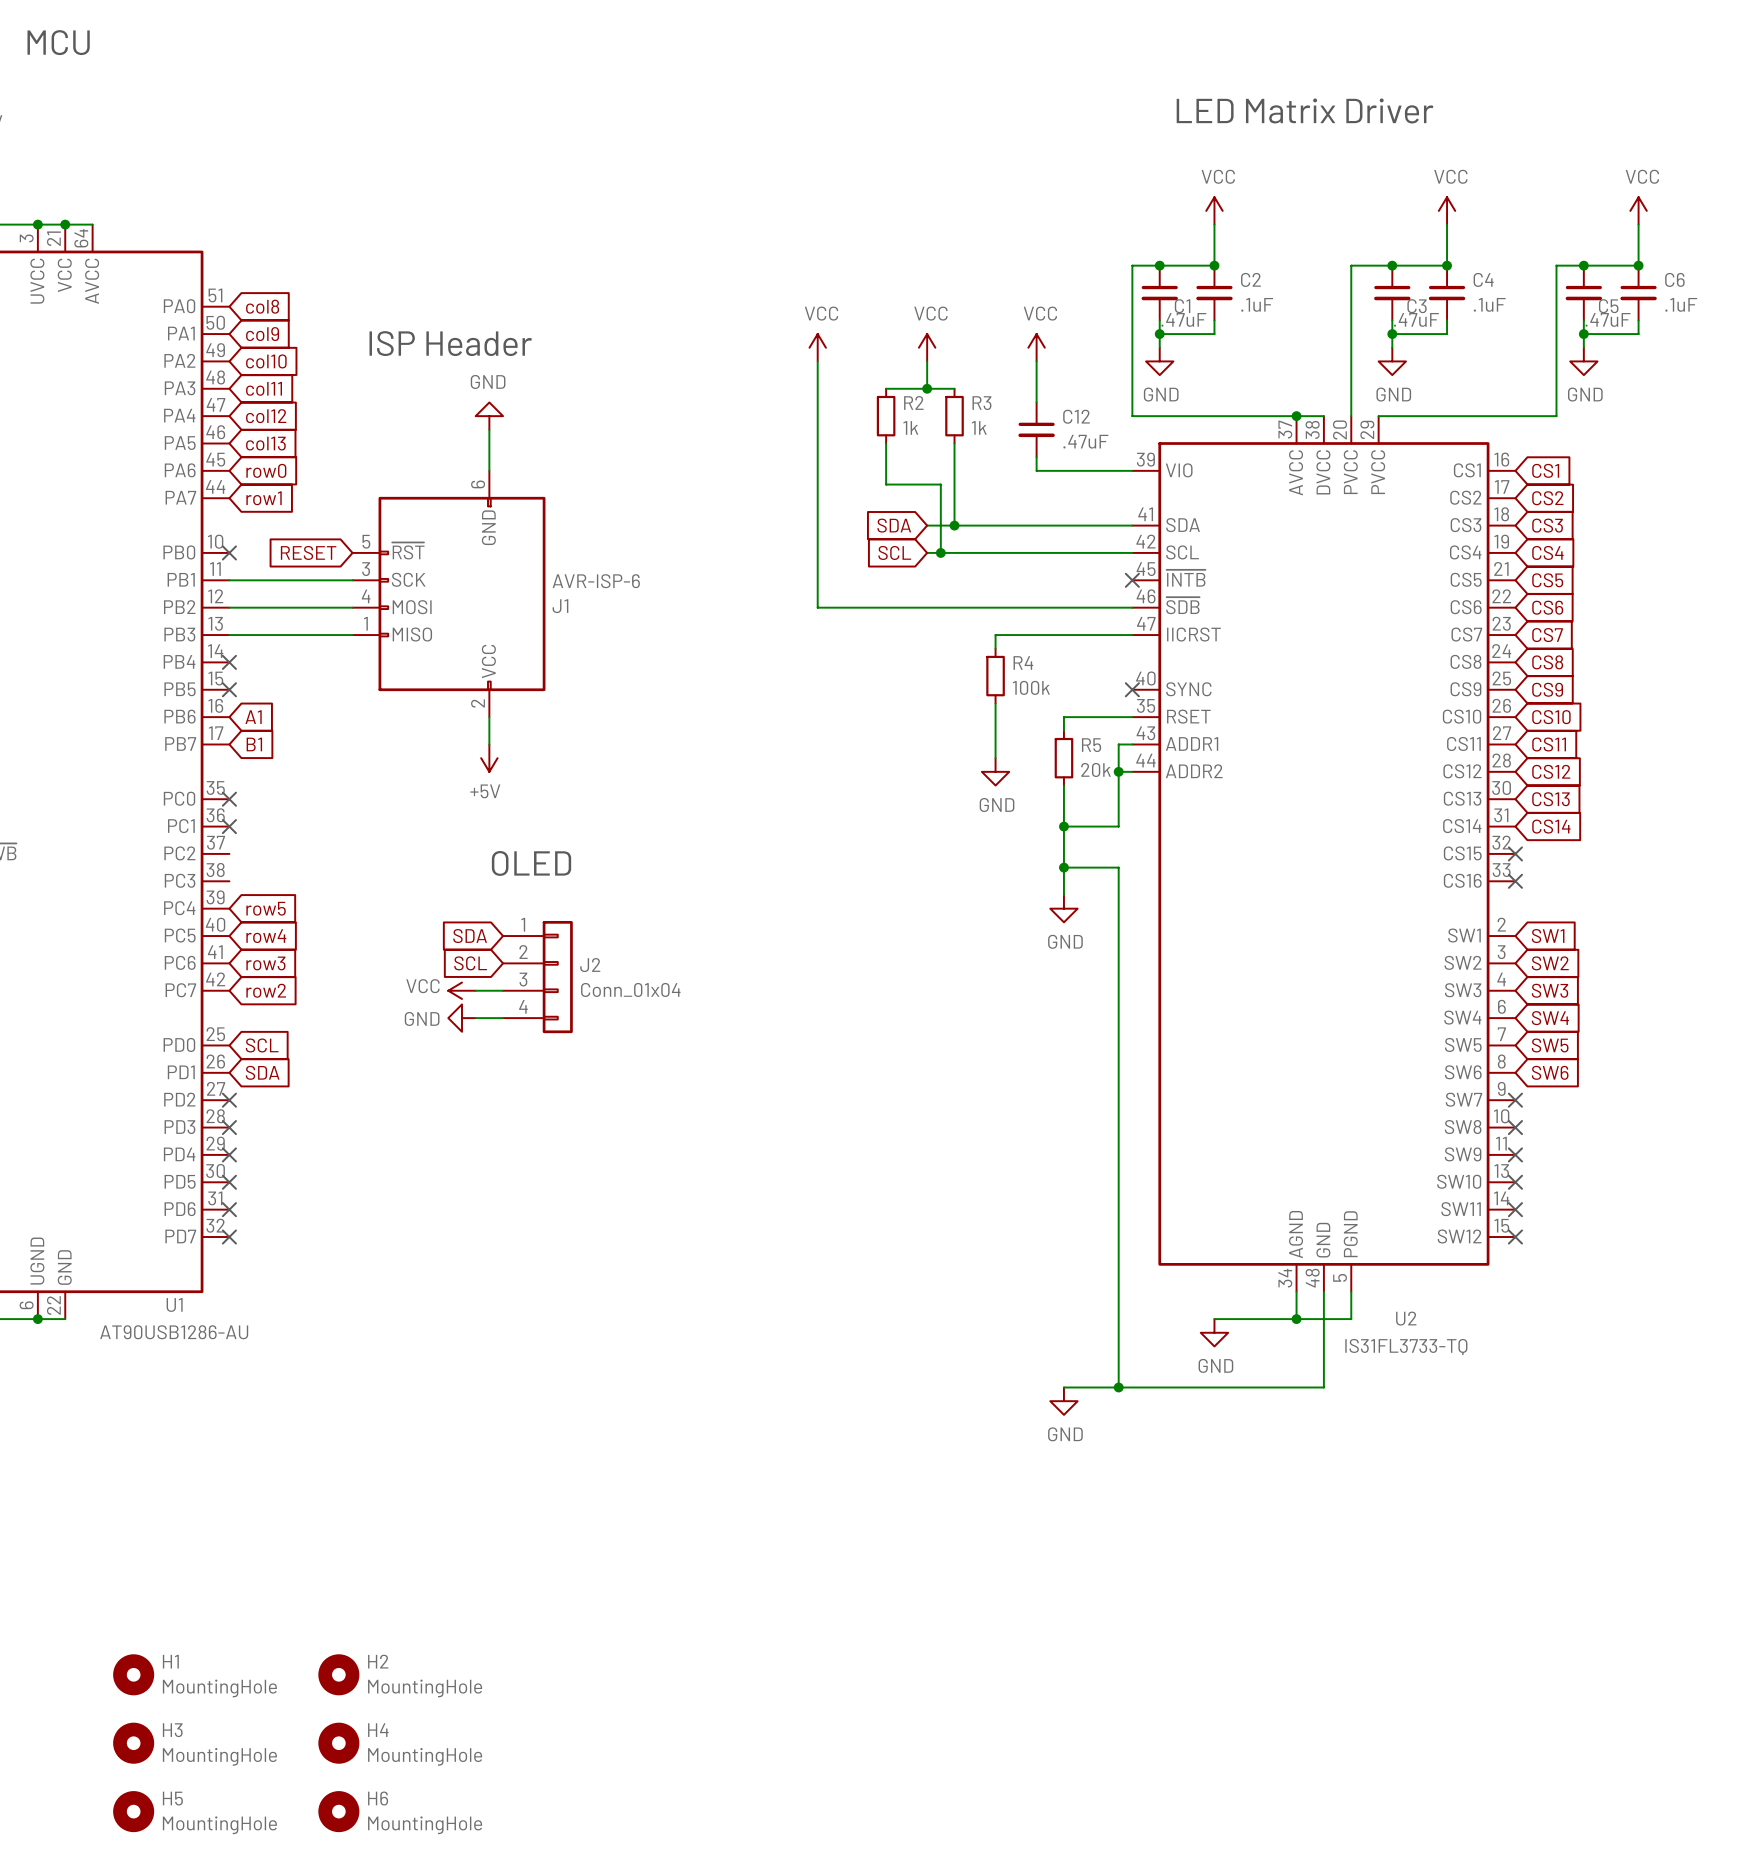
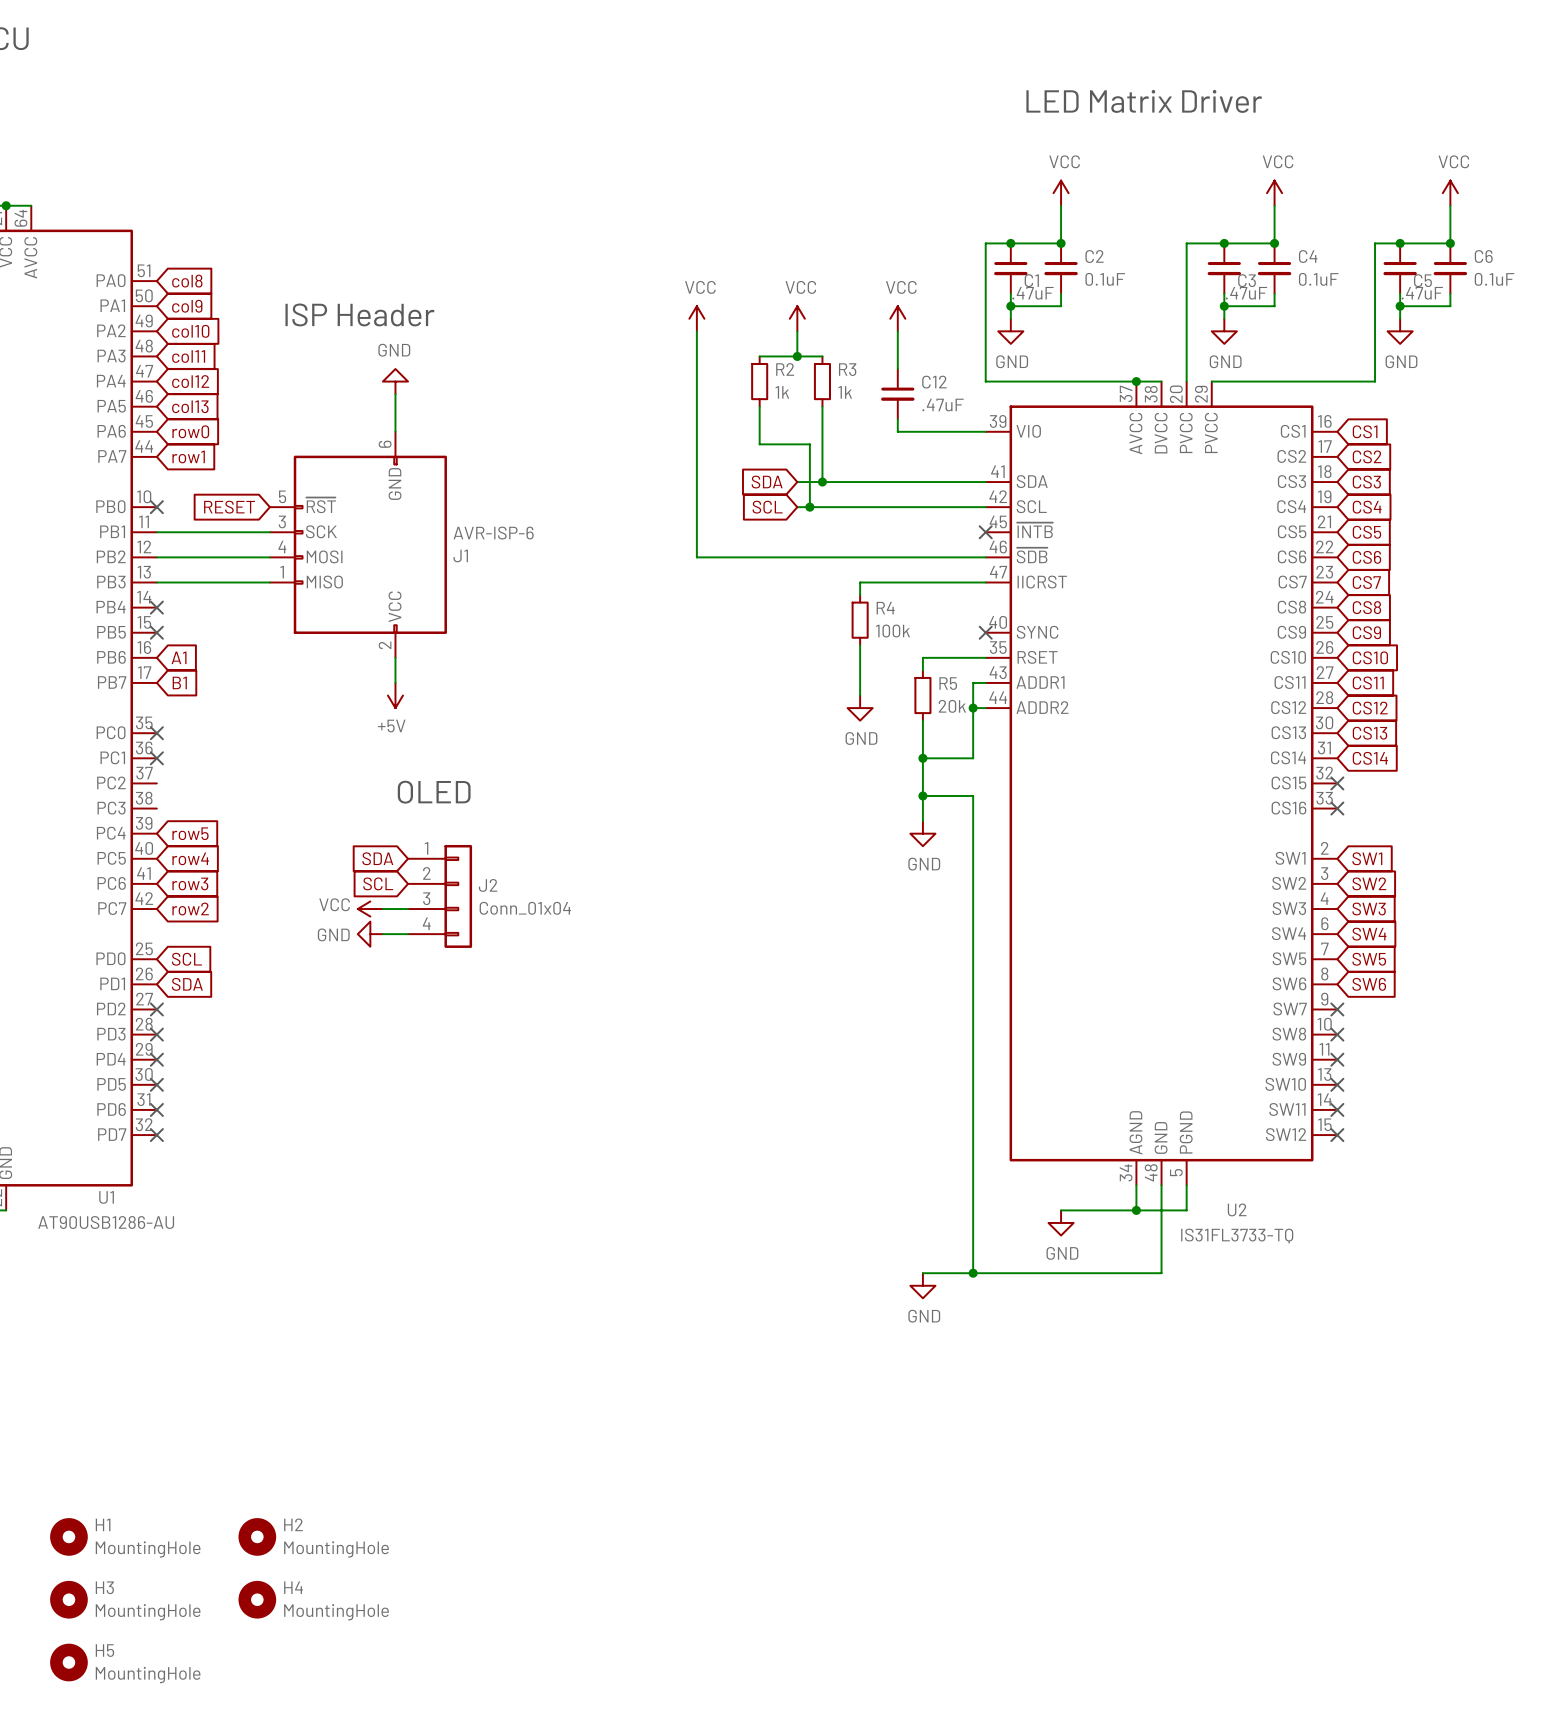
C2 value: .1uF (1257, 304) -> 0.1uF (1105, 279)
C4 value: .1uF (1489, 304) -> 0.1uF (1318, 279)
C6 value: .1uF (1681, 304) -> 0.1uF (1494, 279)
H6: MountingHole (338, 1811) -> none

